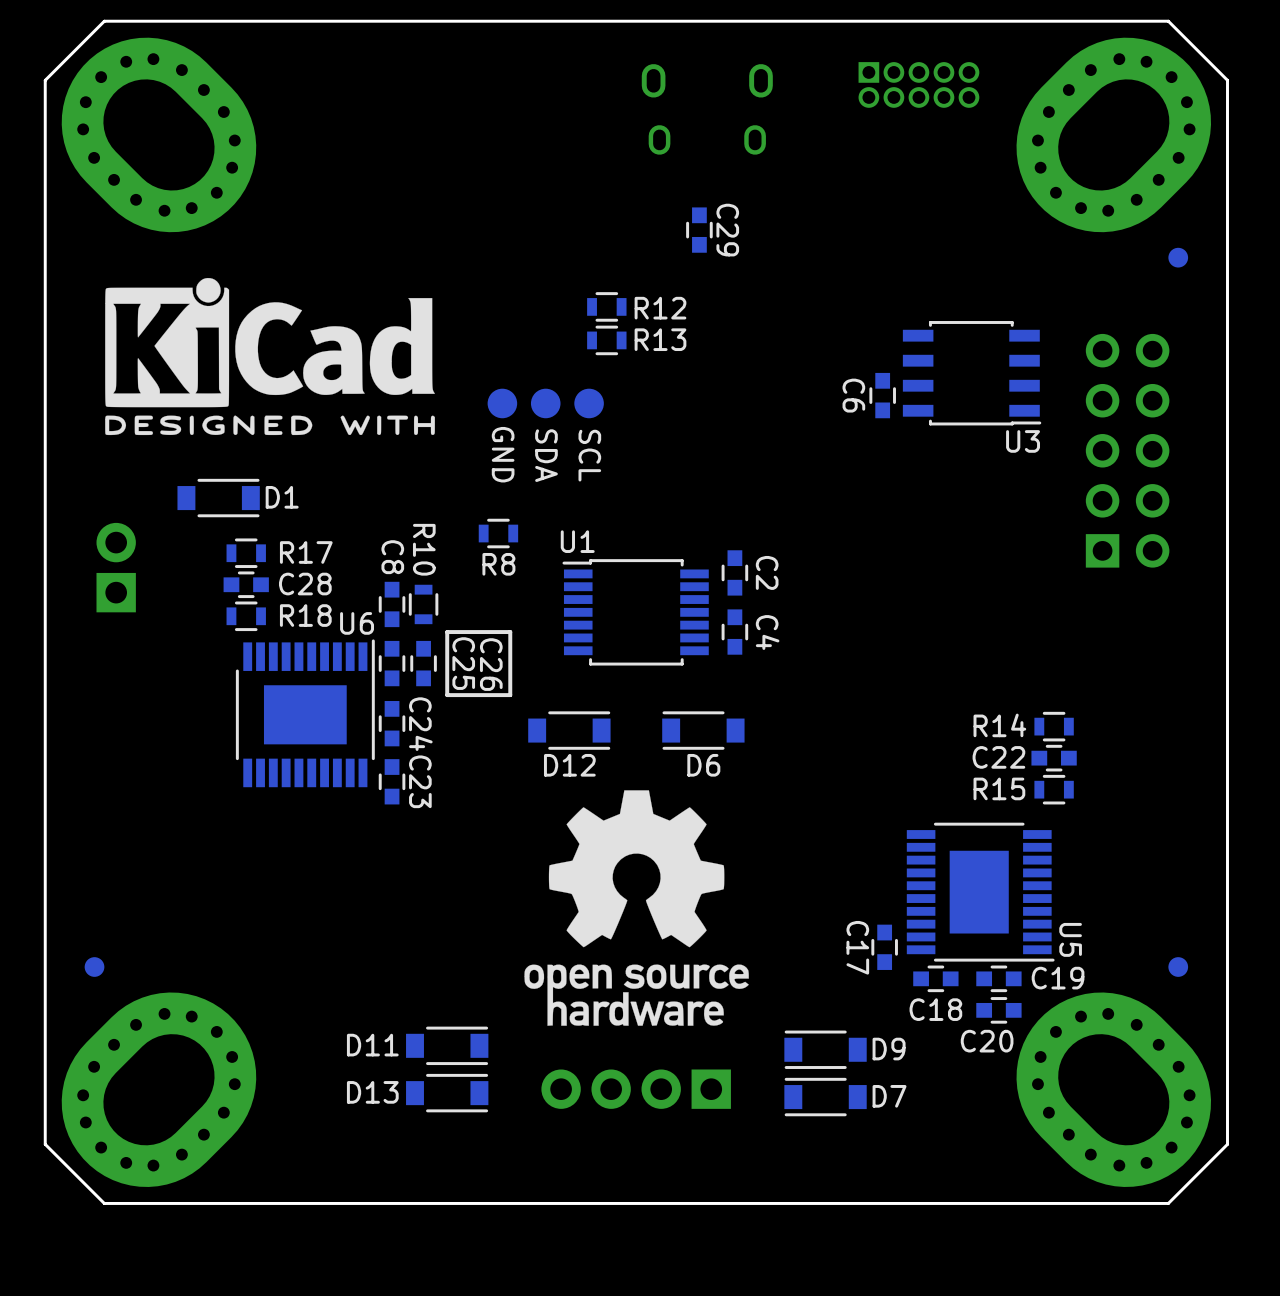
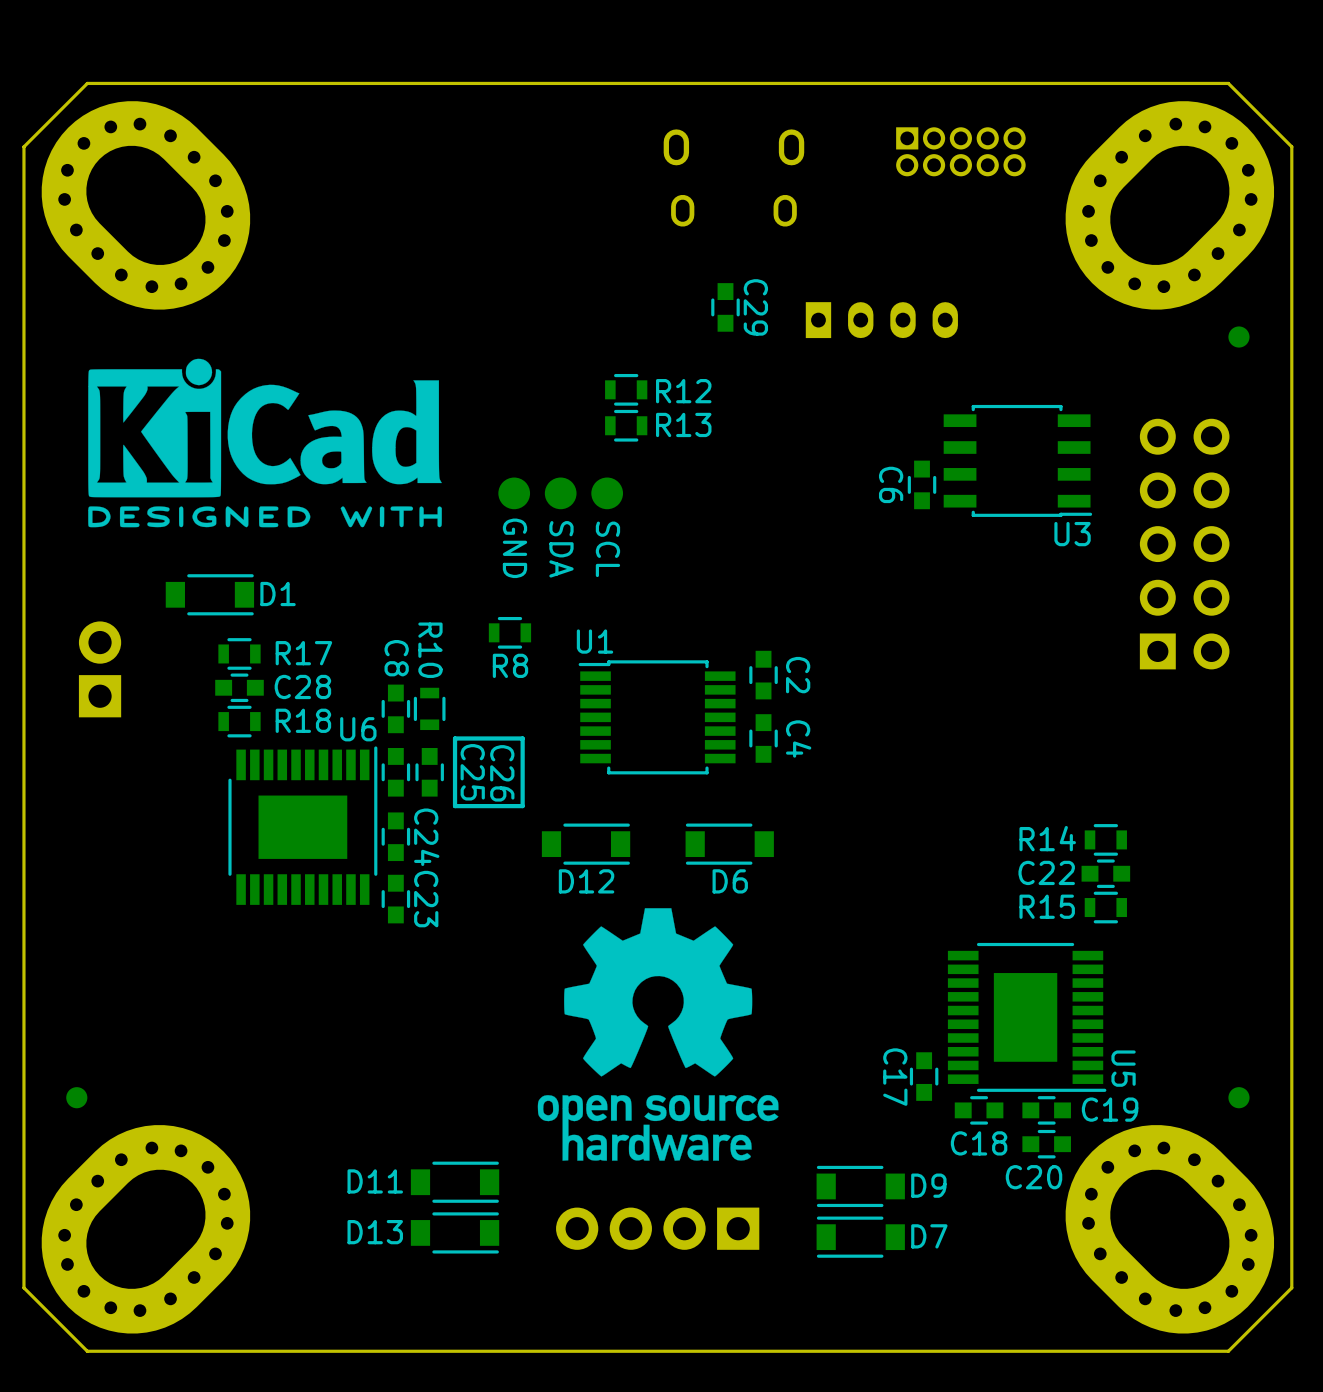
part: none -> (881, 320)

